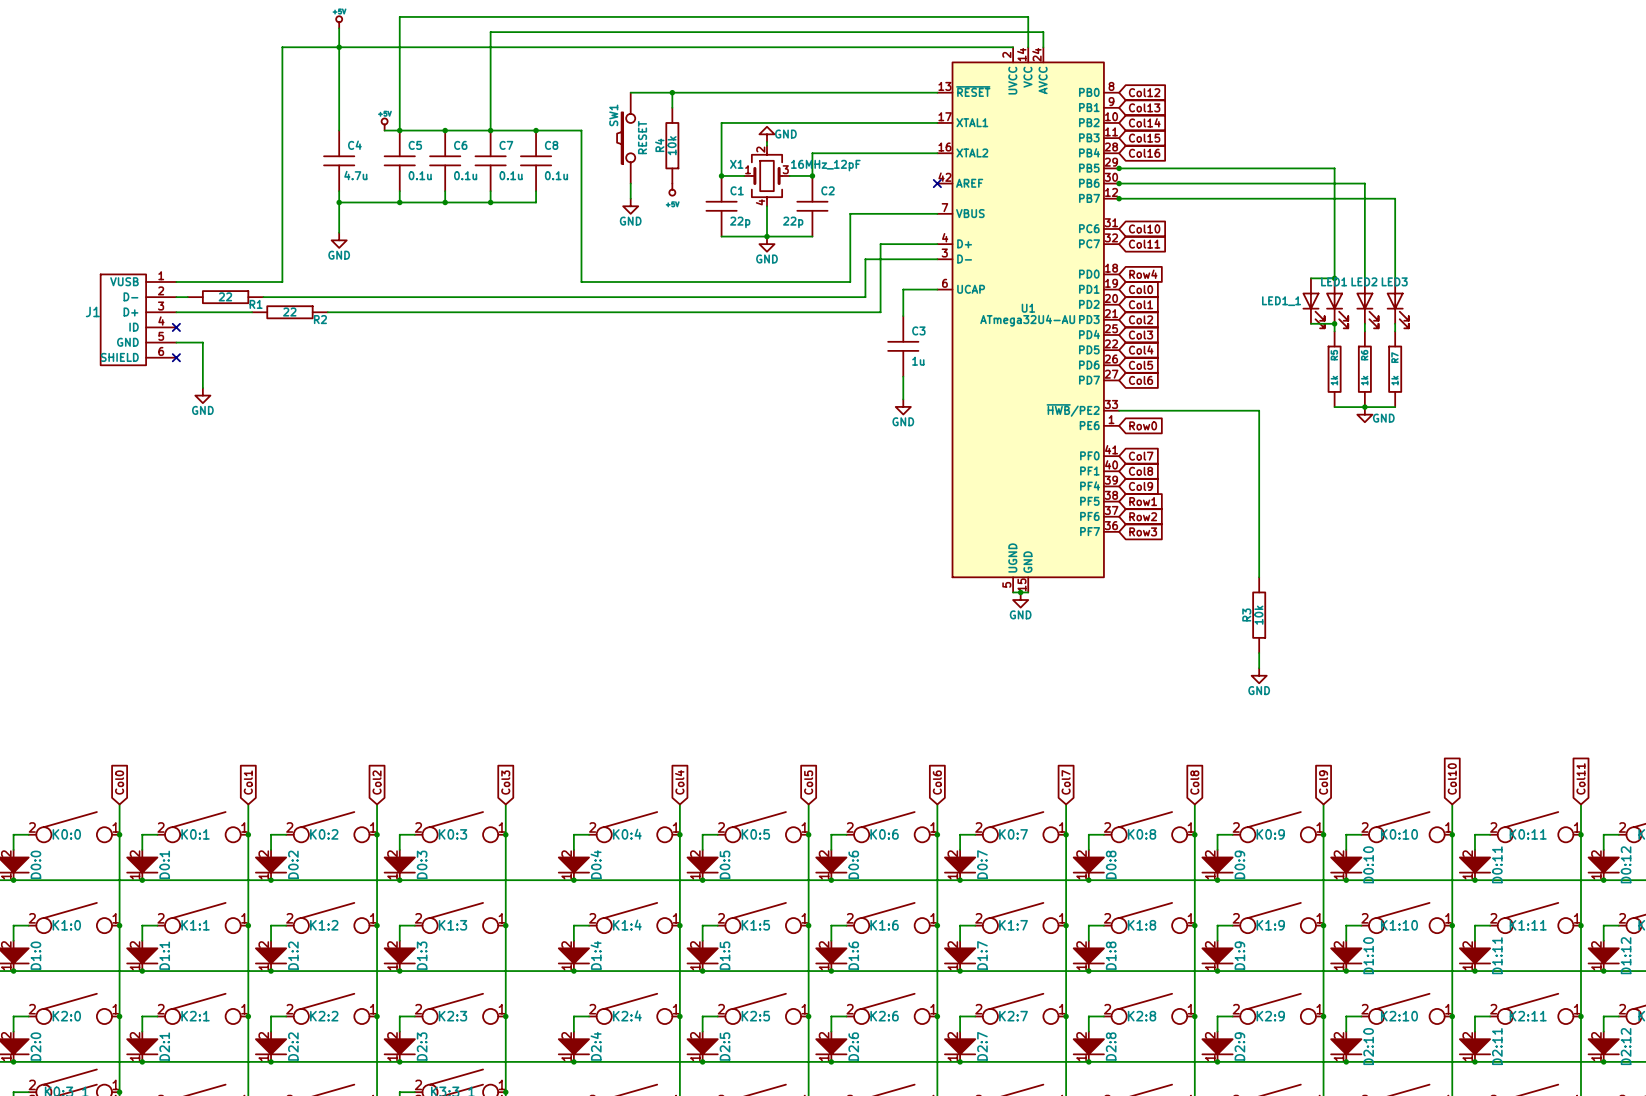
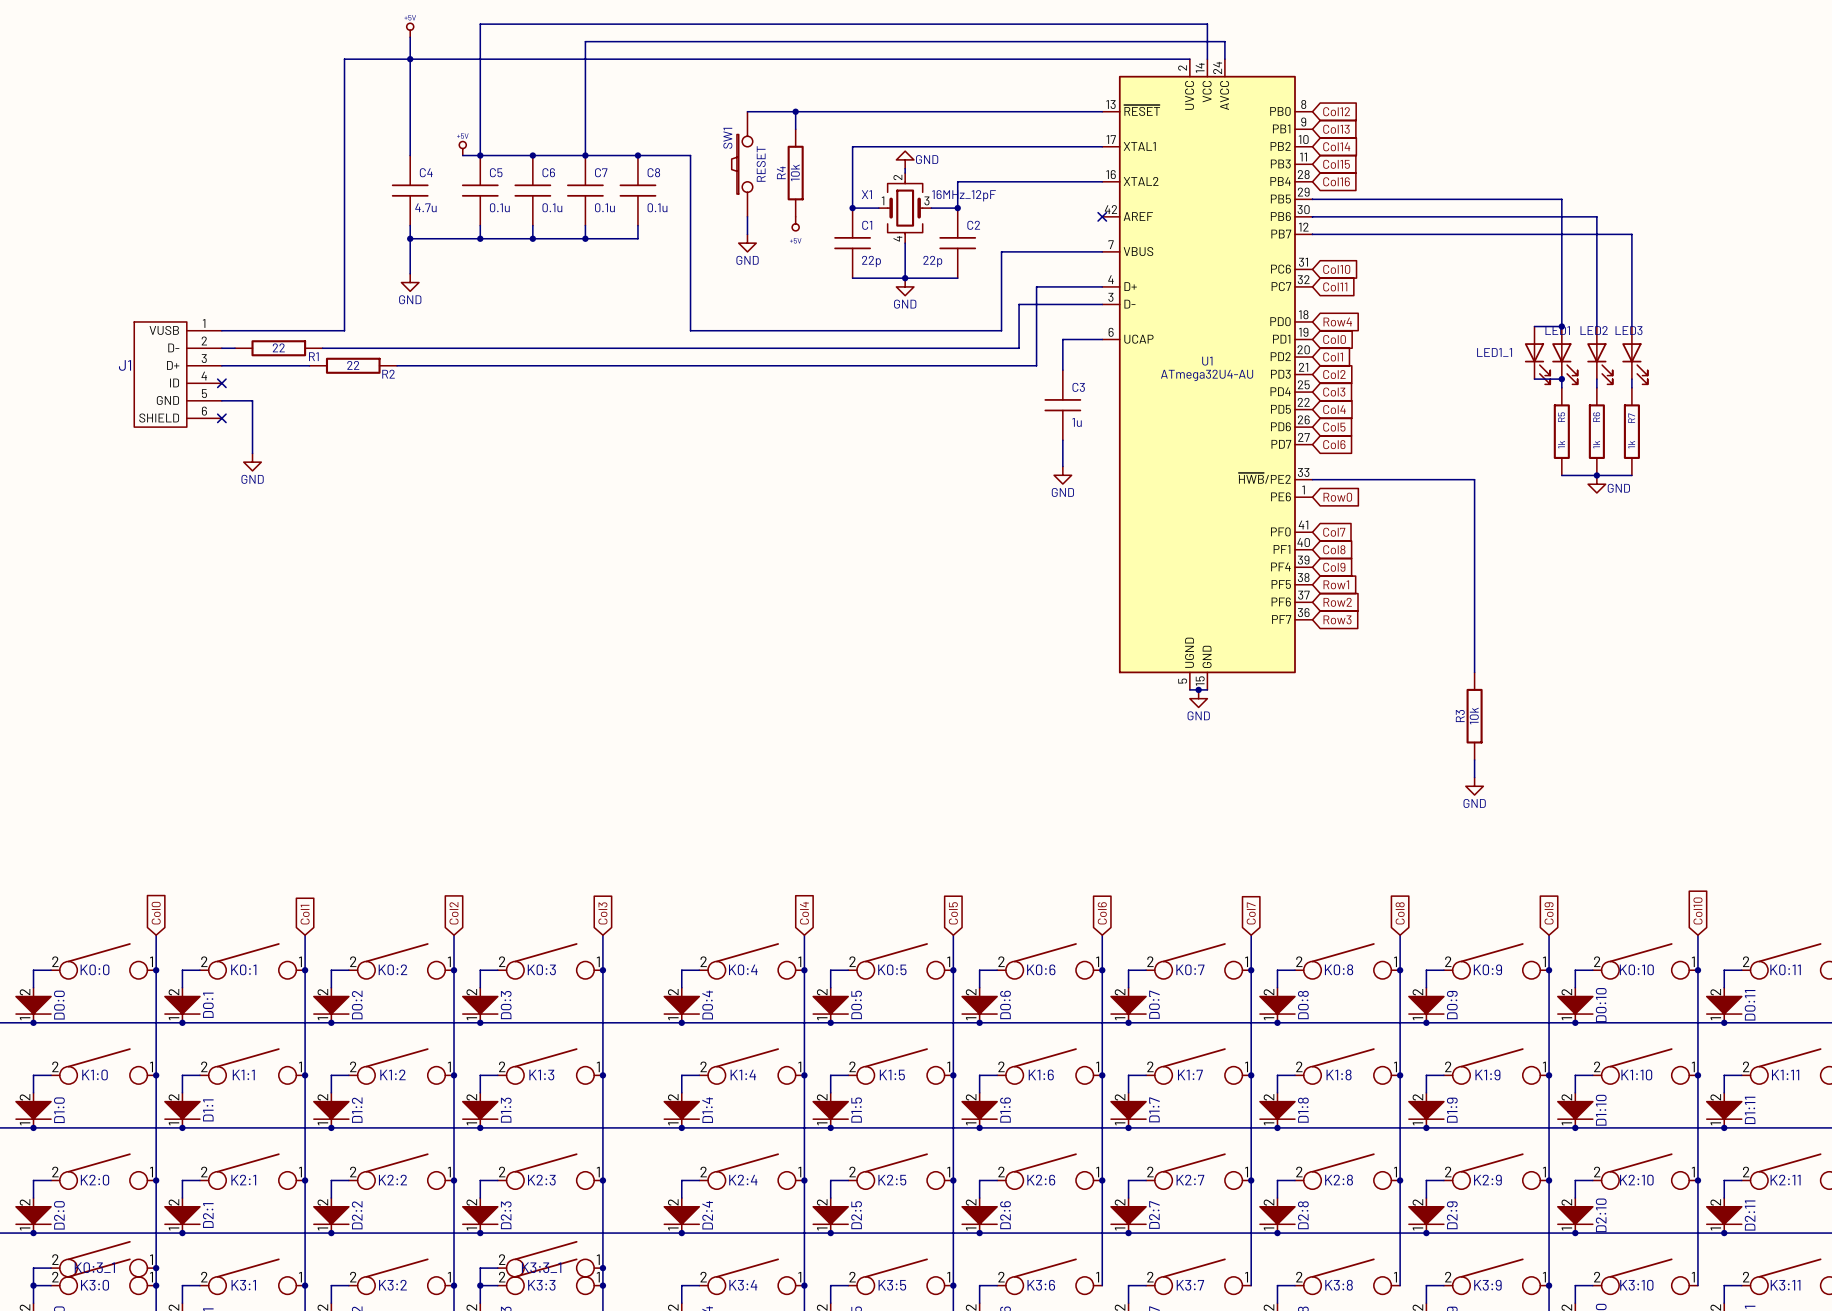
junction: (1119, 168) -> none
junction: (1119, 183) -> none
junction: (1119, 198) -> none

